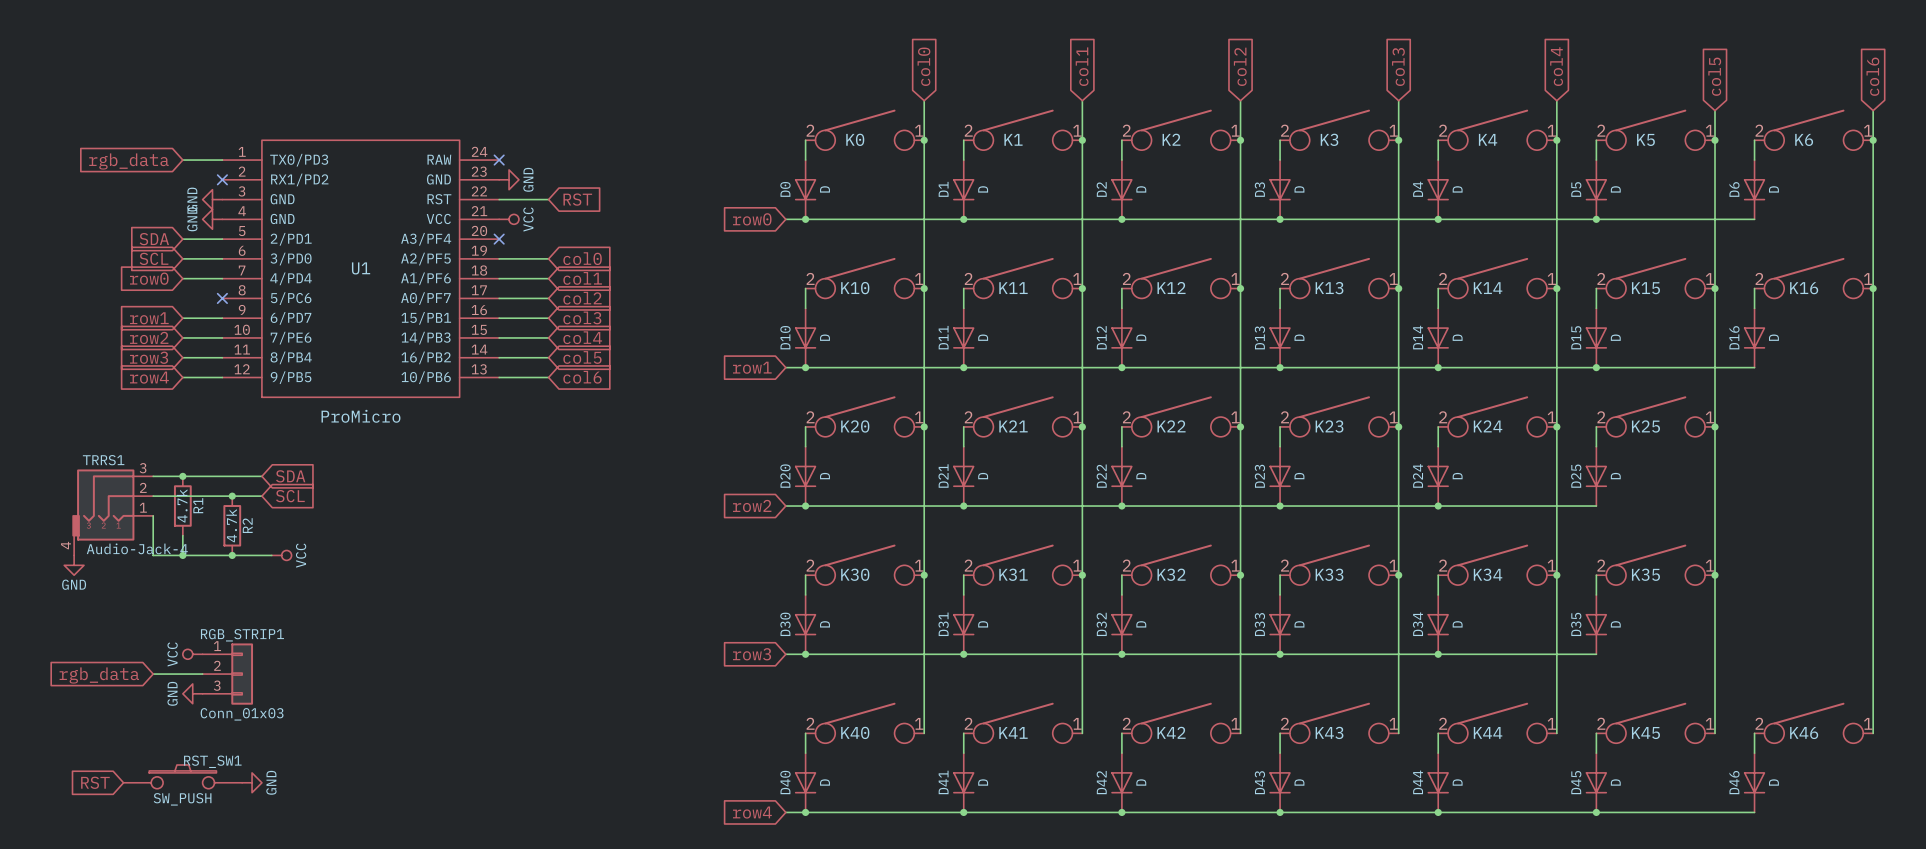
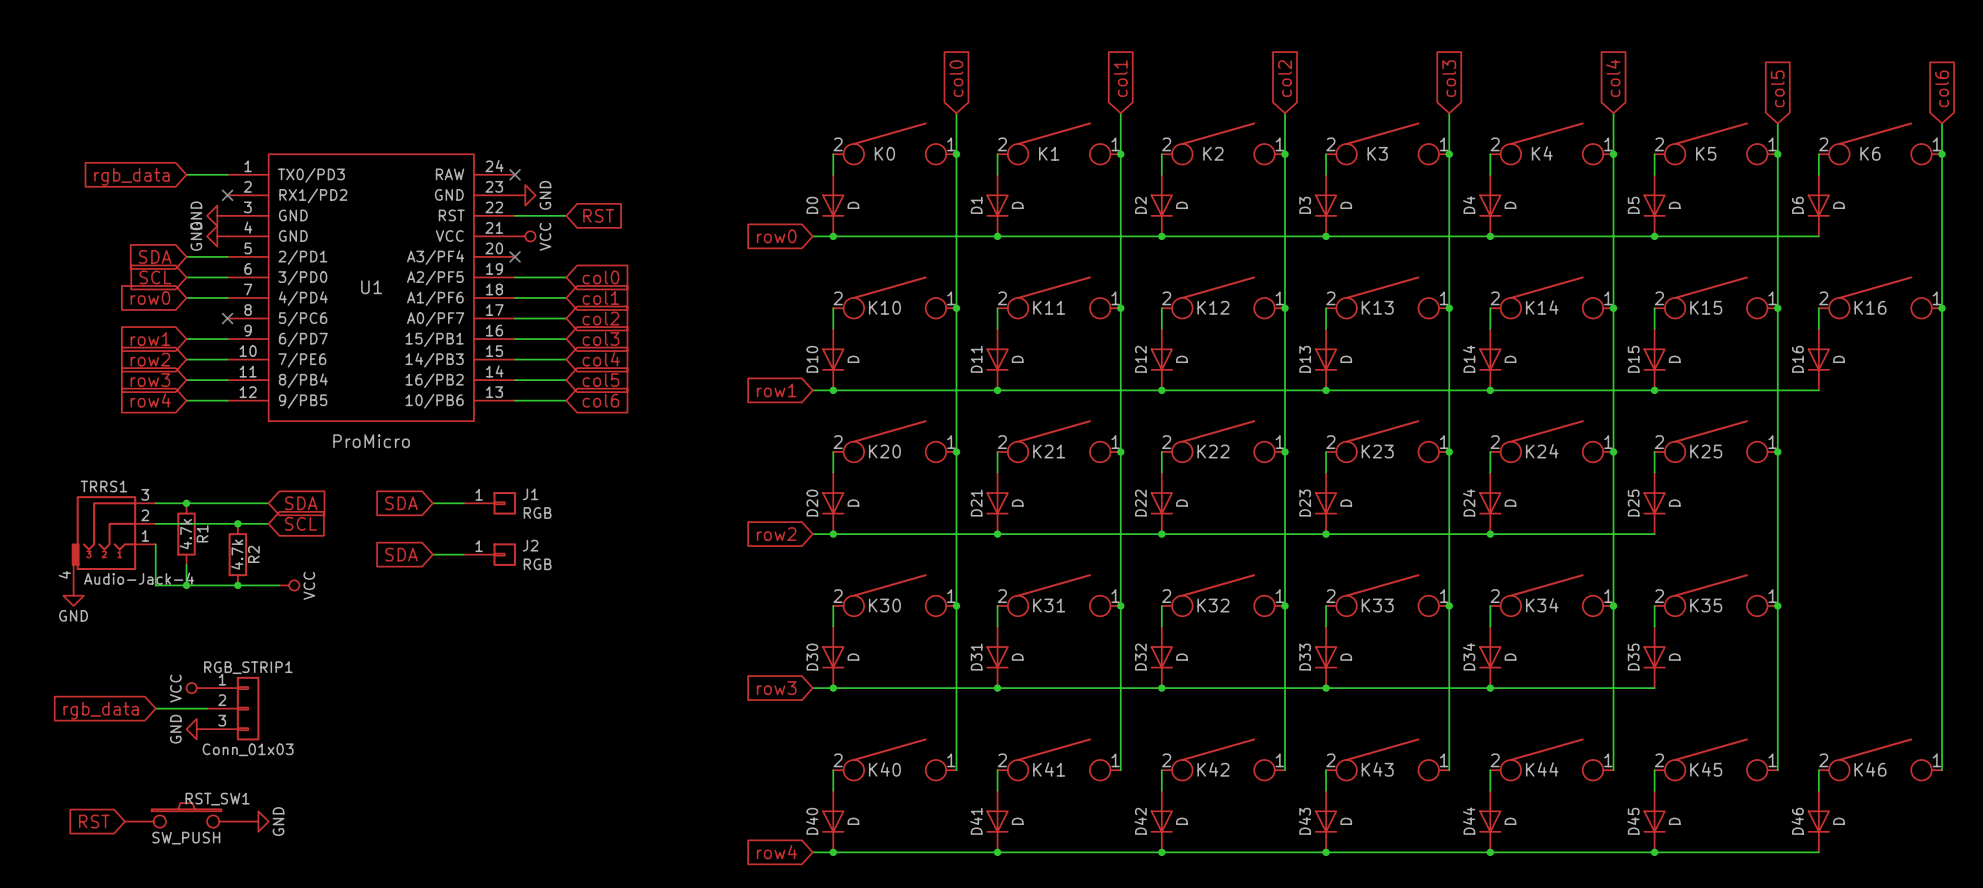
global label: none -> SDA (401, 503)
wire: none -> (432, 503) (463, 503)
J1: none -> RGB (489, 503)
global label: none -> SDA (401, 554)
wire: none -> (432, 554) (463, 554)
J2: none -> RGB (489, 554)

